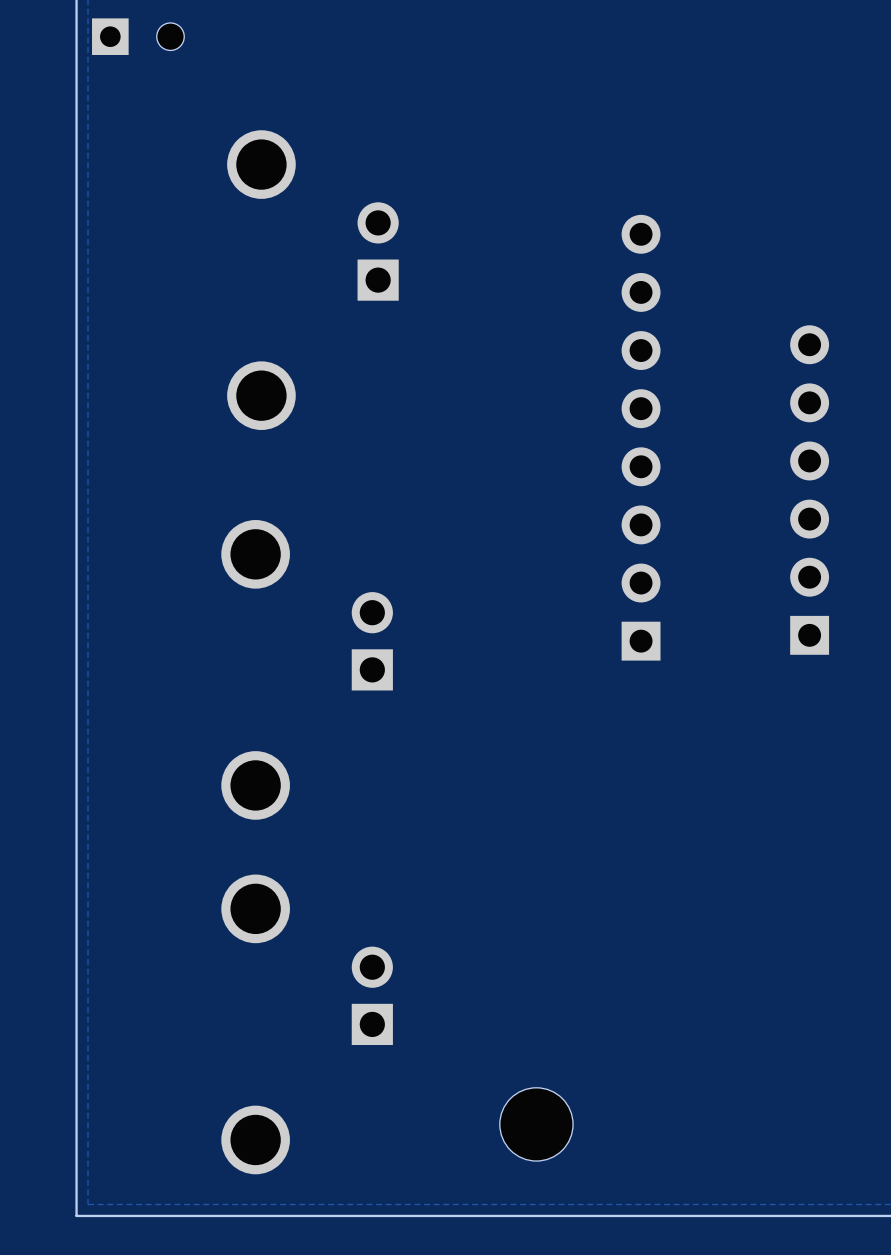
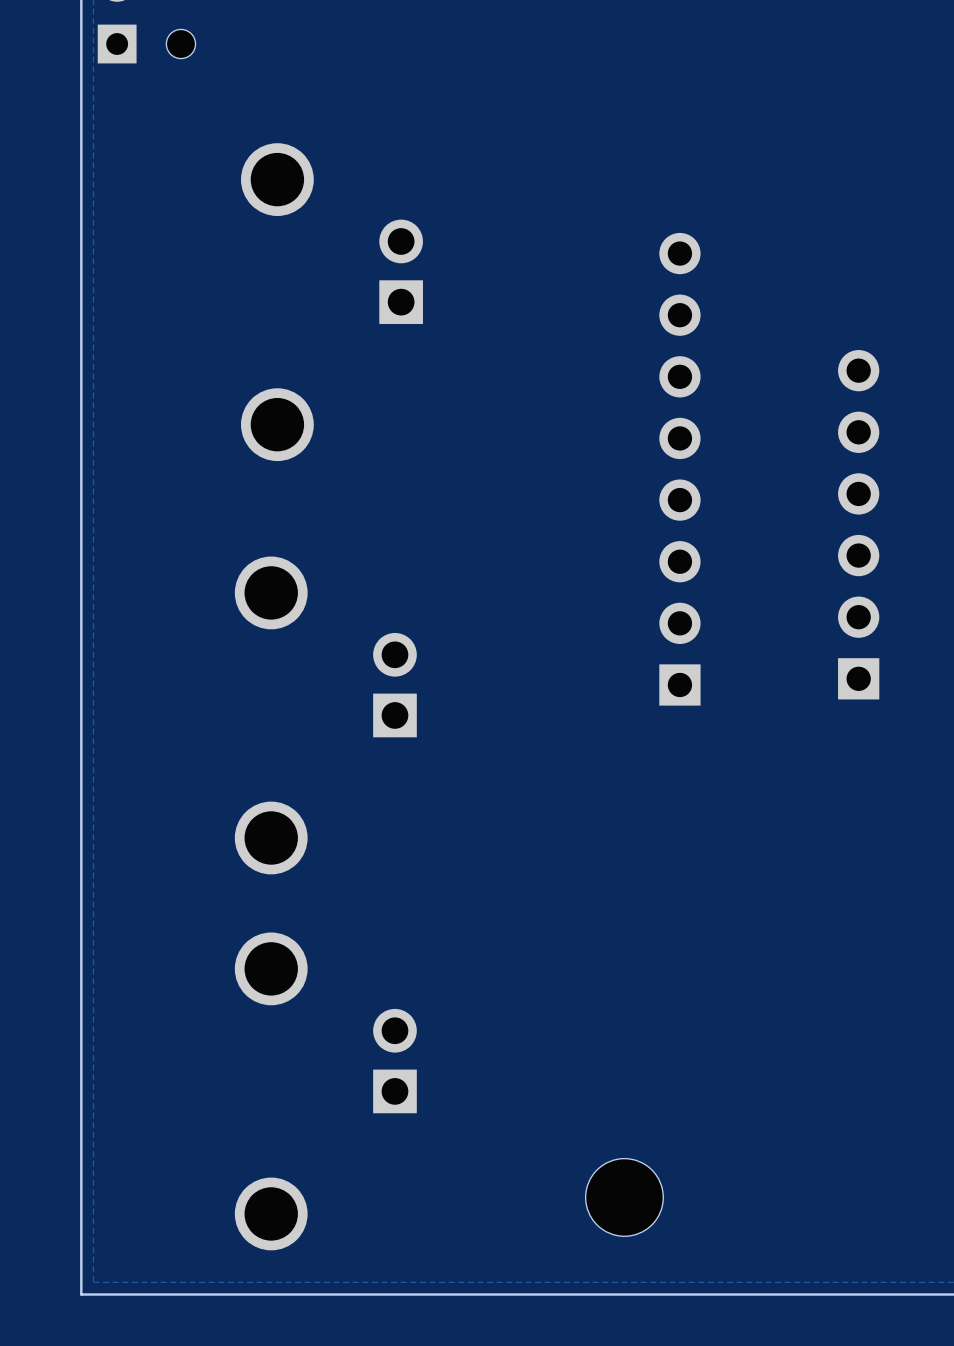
part position: (536, 1124) -> (624, 1197)

